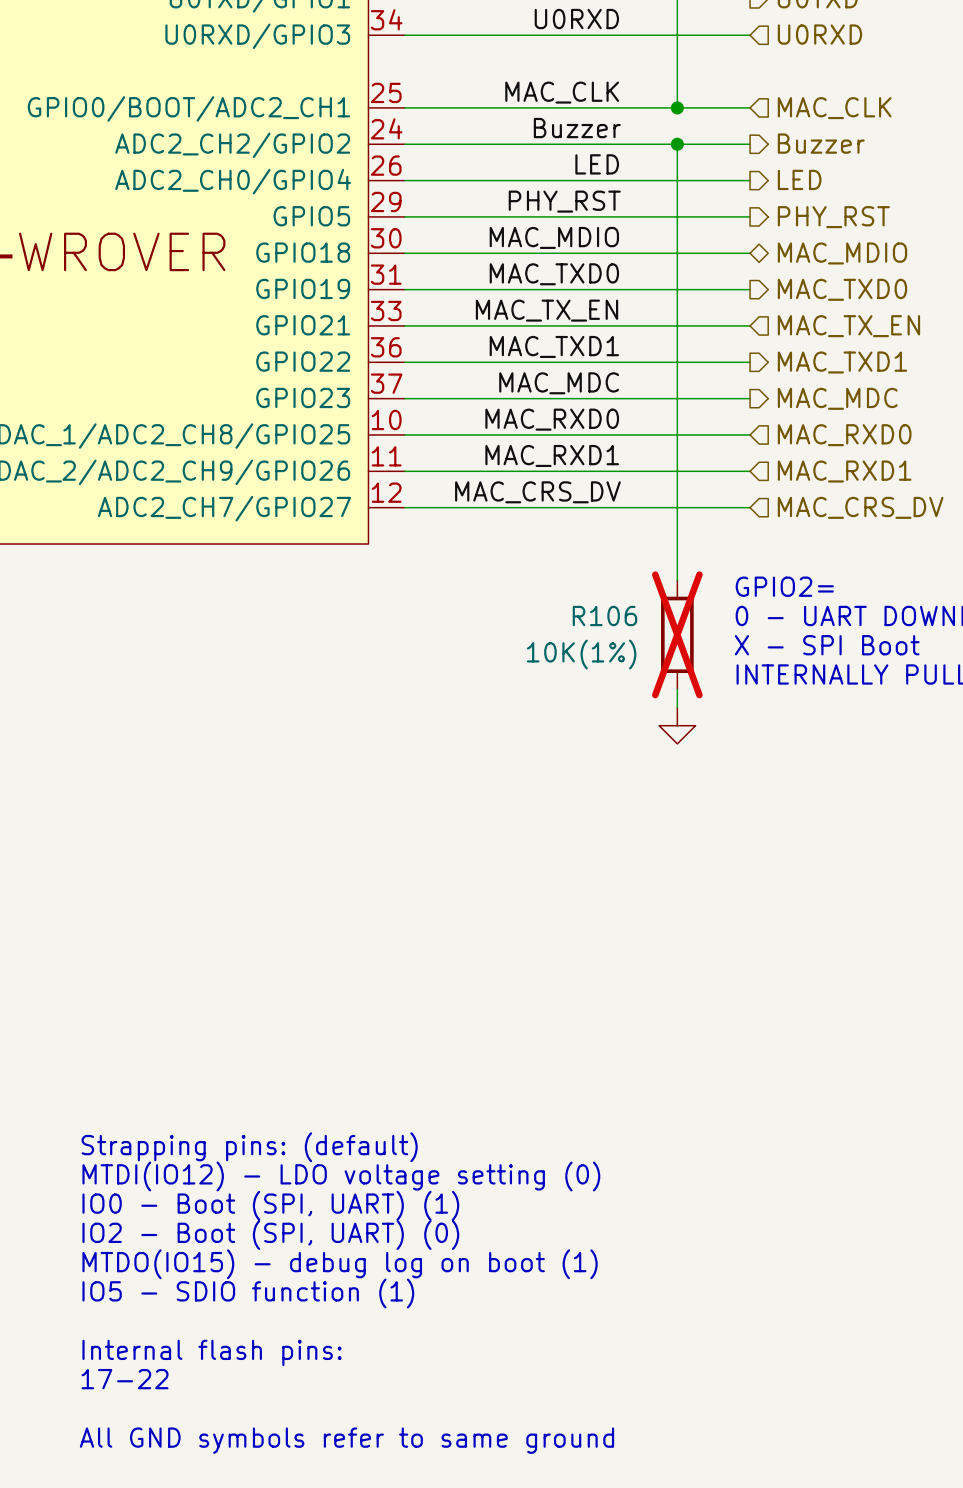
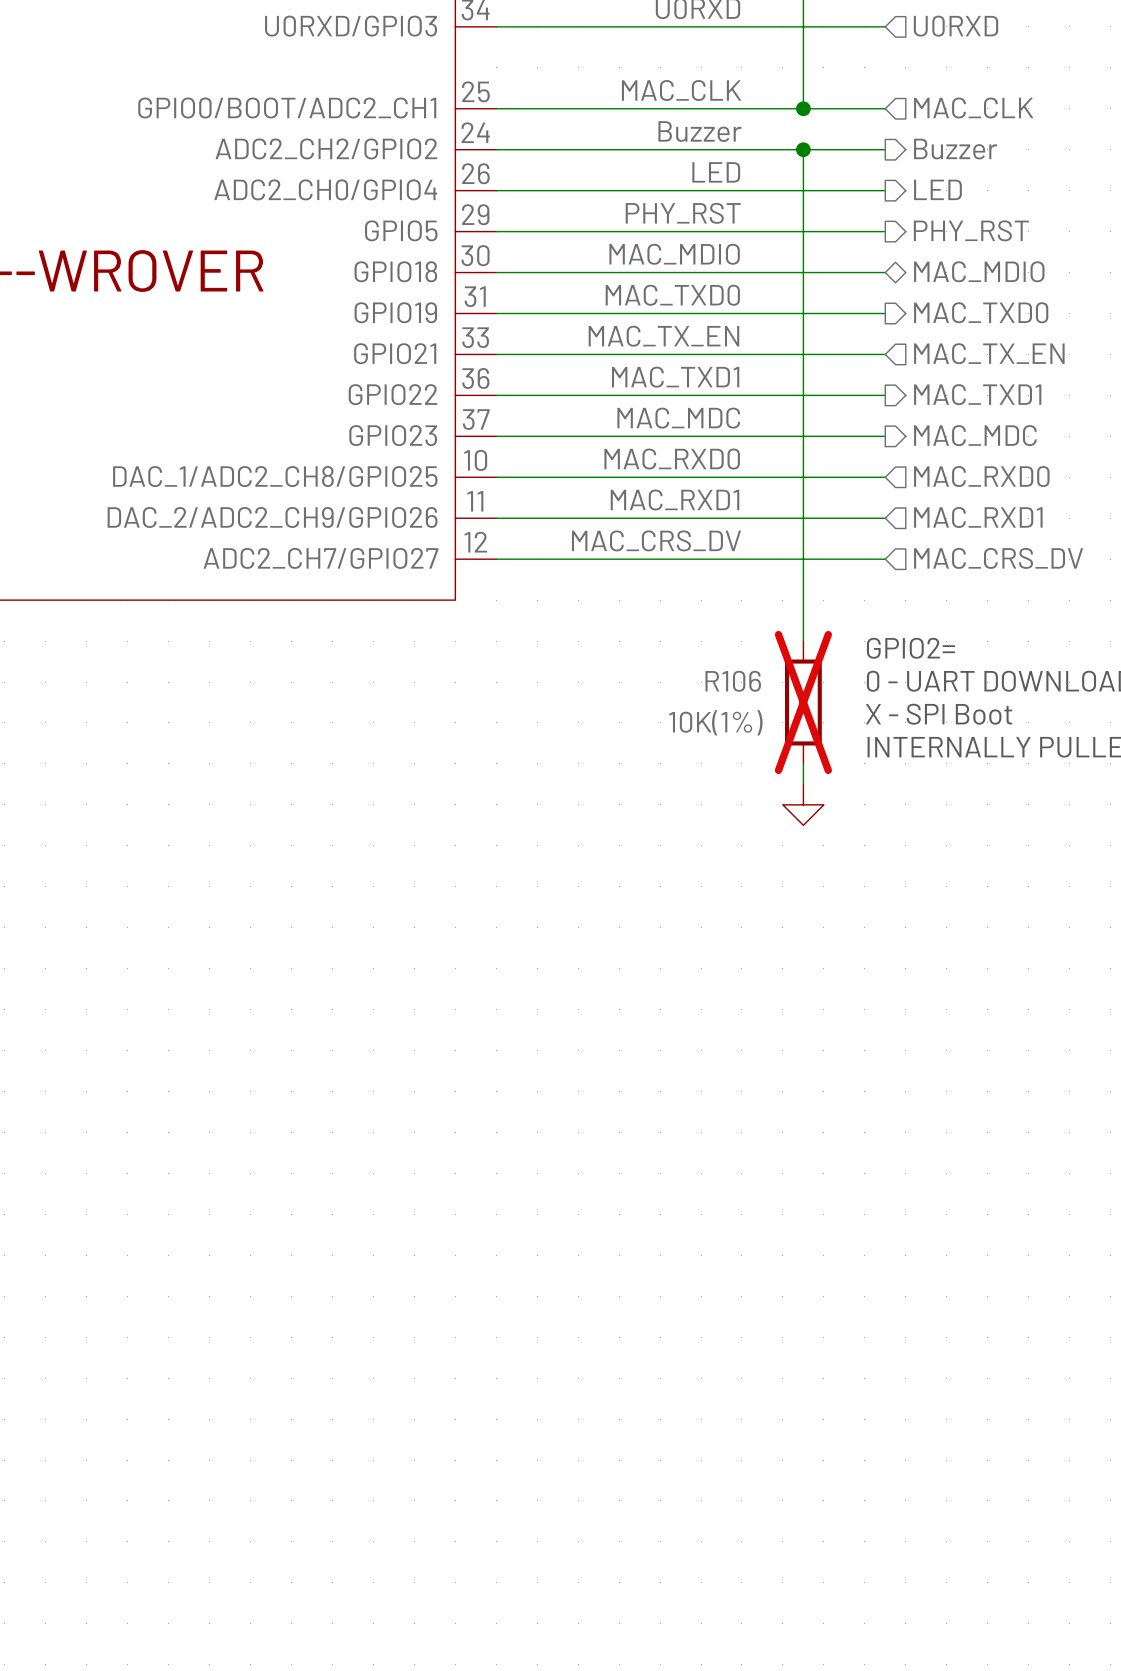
text: Strapping pins: (default) (249, 1147) -> none
text: MTDI(IO12) - LDO voltage setting (0) (341, 1176) -> none
text: IO0 - Boot (SPI, UART) (1) (270, 1205) -> none
text: IO2 - Boot (SPI, UART) (0) (270, 1235) -> none
text: MTDO(IO15) - debug log on boot (1) (340, 1264) -> none
text: IO5 - SDIO function (1) (248, 1293) -> none
text: Internal flash pins: (211, 1352) -> none
text: 17-22 (125, 1379) -> none
text: All GND symbols refer to same ground (346, 1440) -> none

